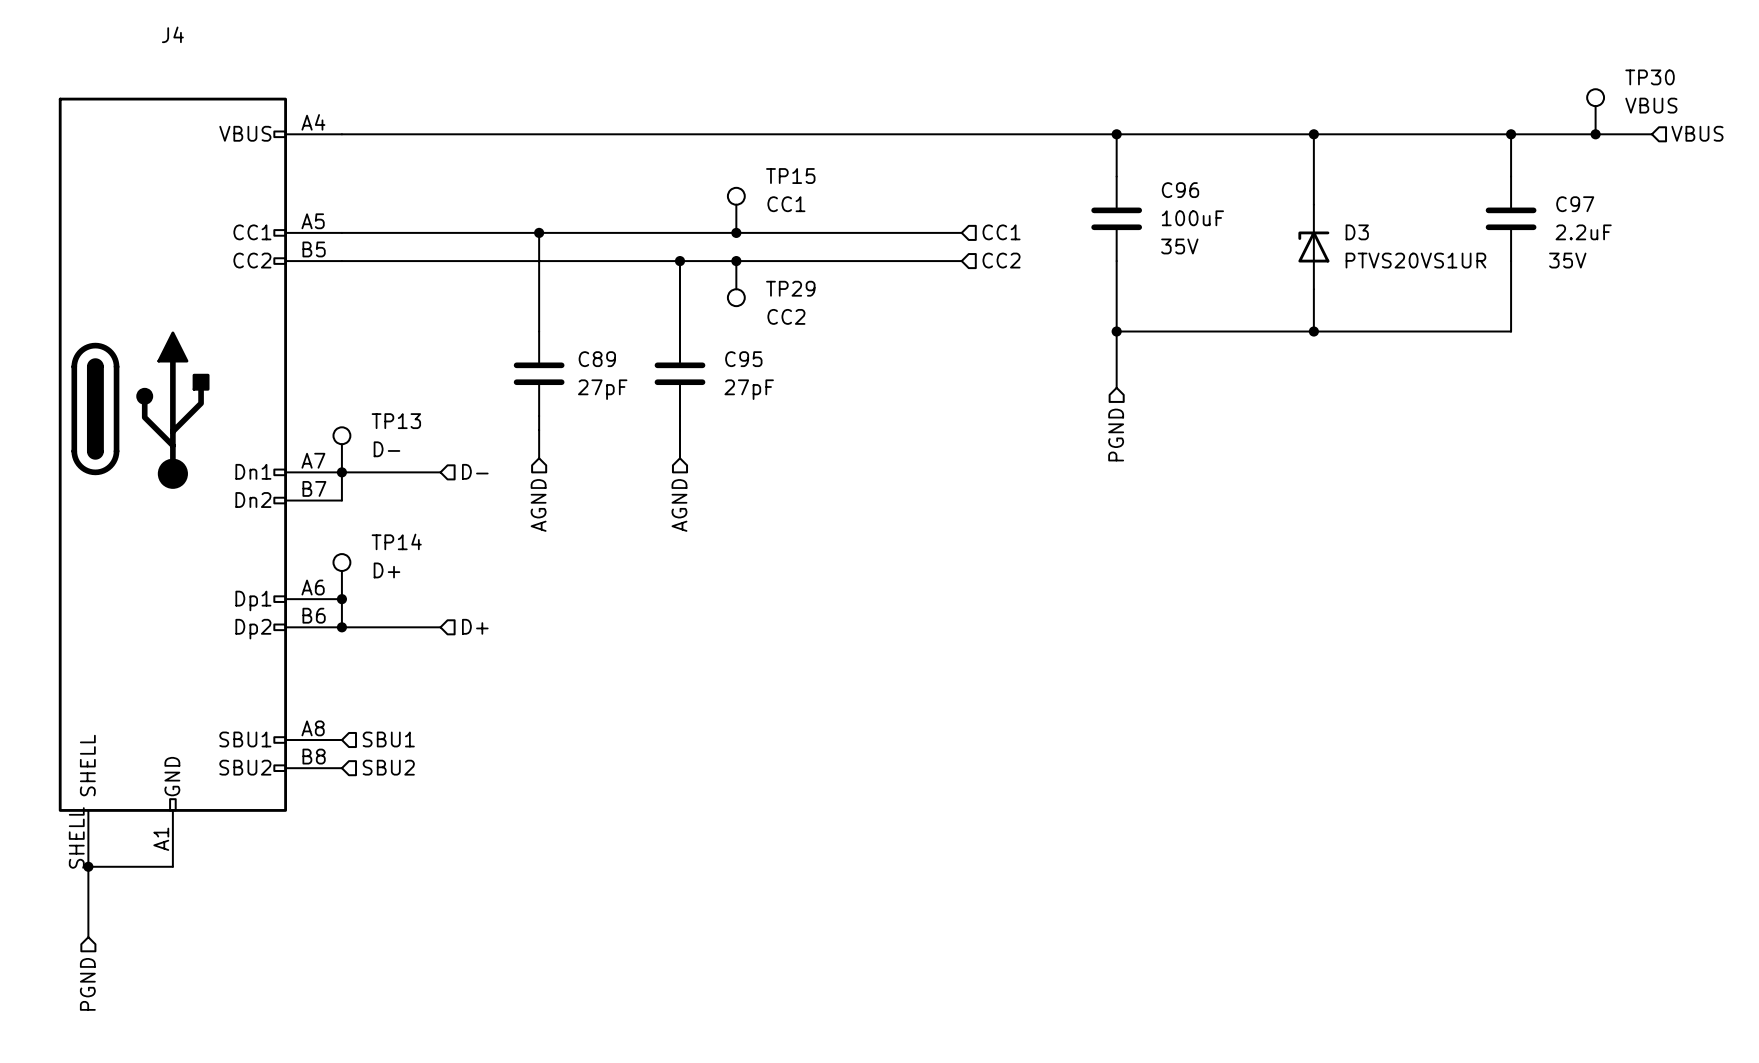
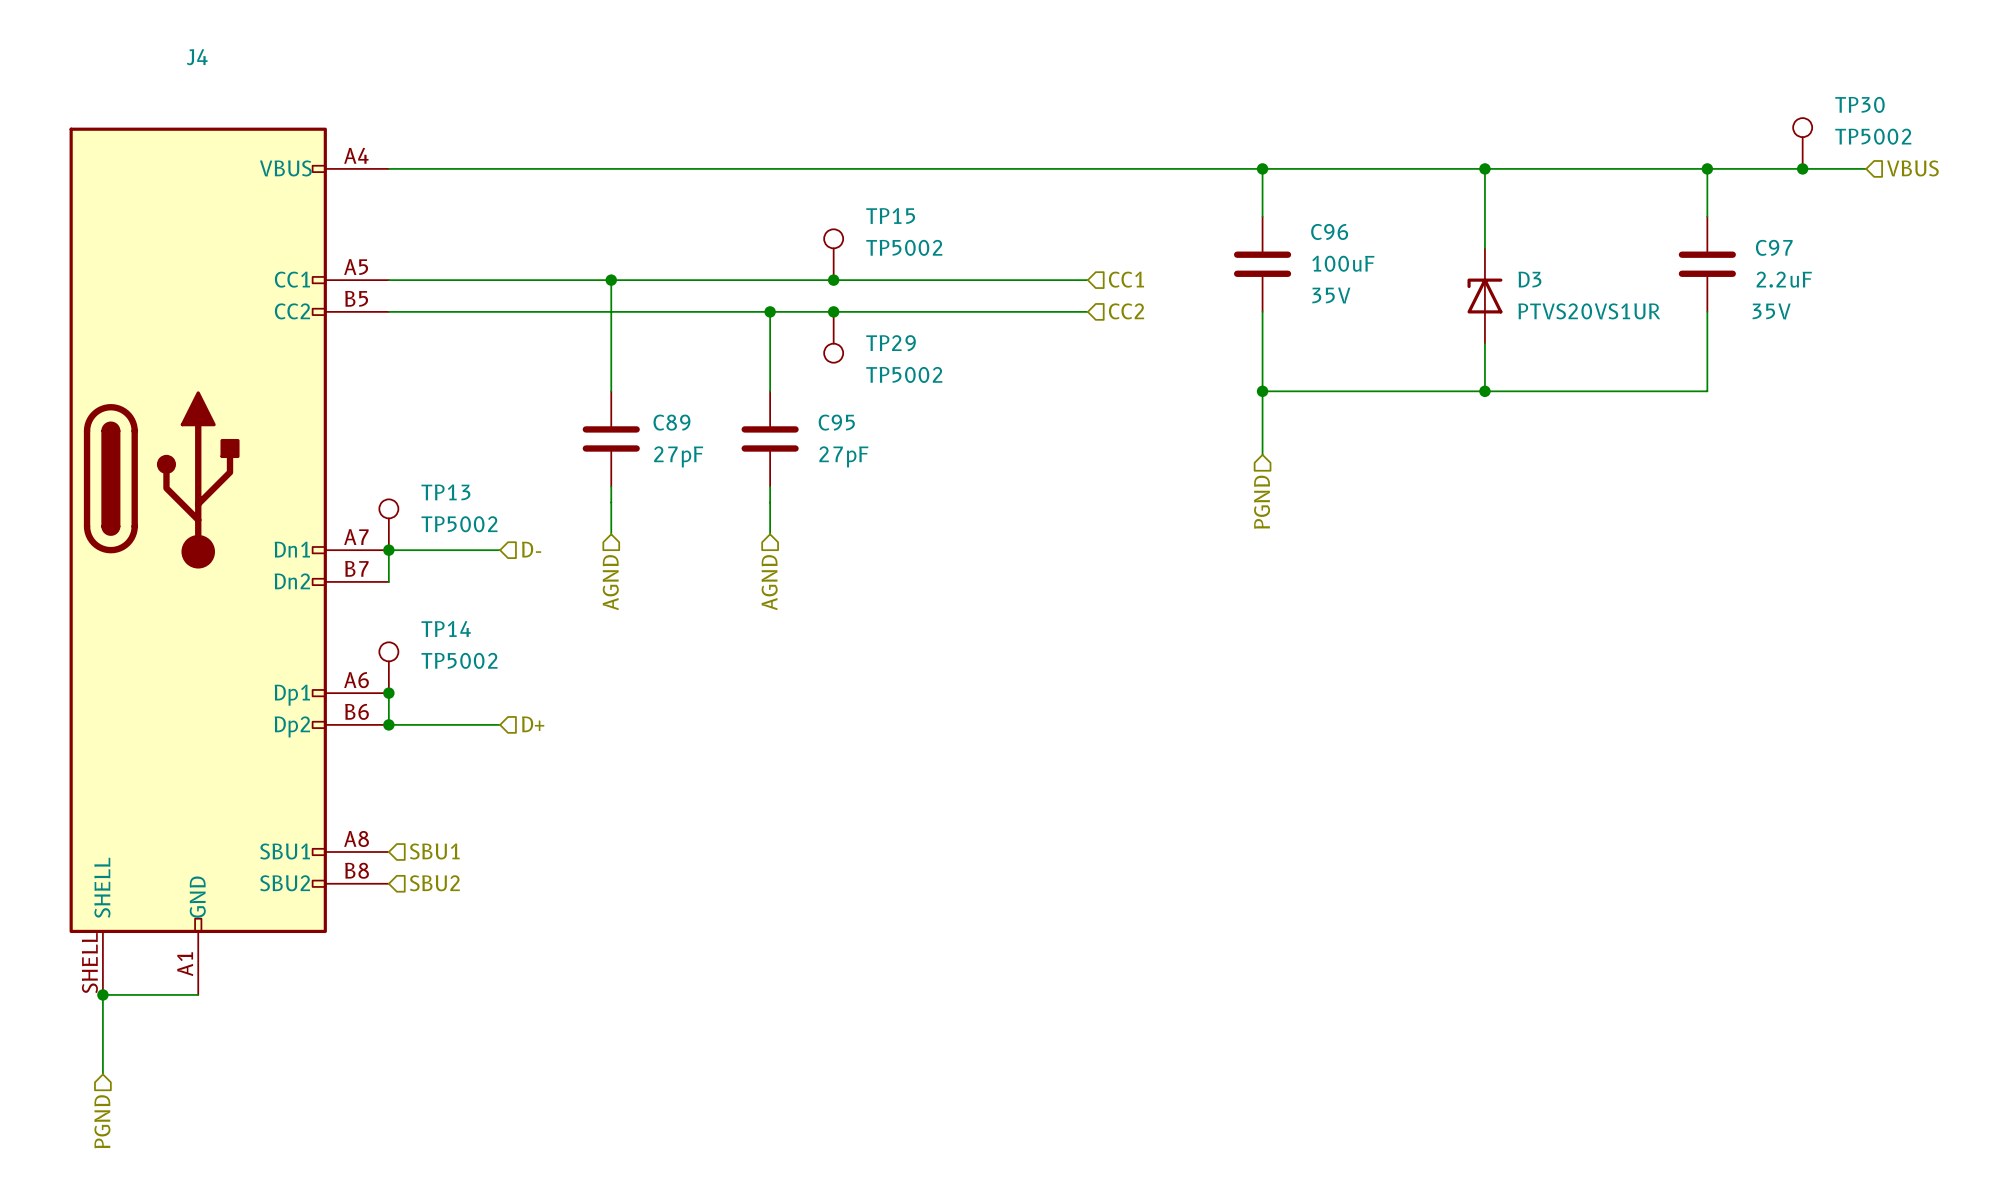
TP30 value: VBUS (1651, 105) -> TP5002 (1873, 136)
TP15 value: CC1 (786, 204) -> TP5002 (904, 247)
TP29 value: CC2 (786, 316) -> TP5002 (904, 374)
TP13 value: D- (386, 449) -> TP5002 (459, 524)
TP14 value: D+ (386, 570) -> TP5002 (459, 660)

